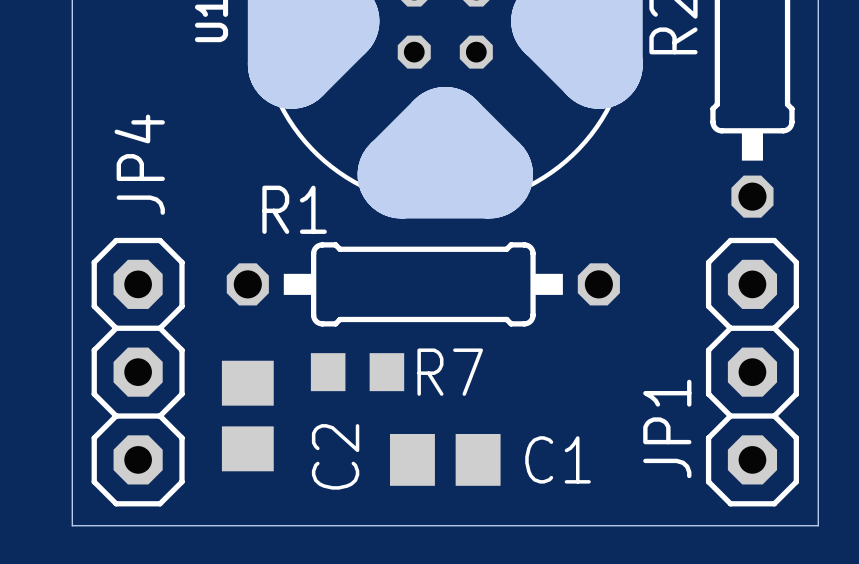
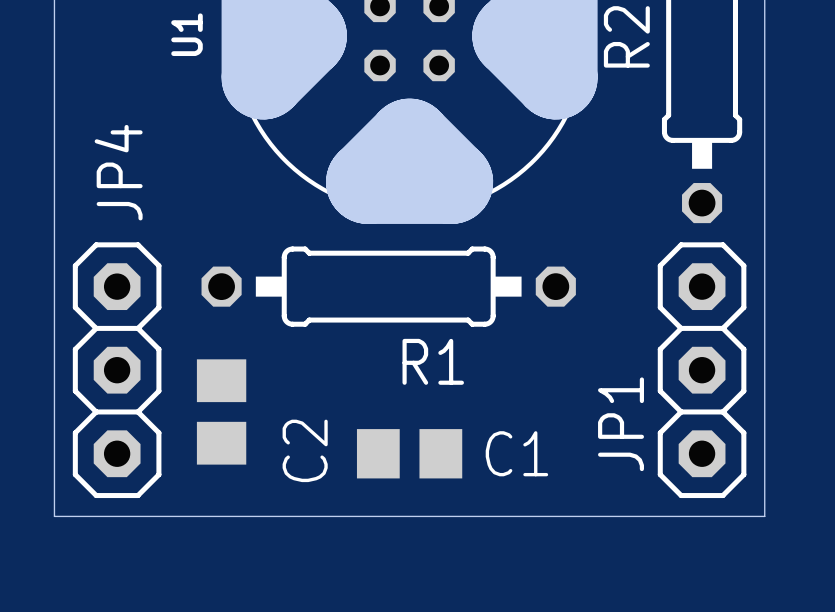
R1 name position: R1 (294, 209) -> R1 (433, 361)
R7: (357, 372) -> none

